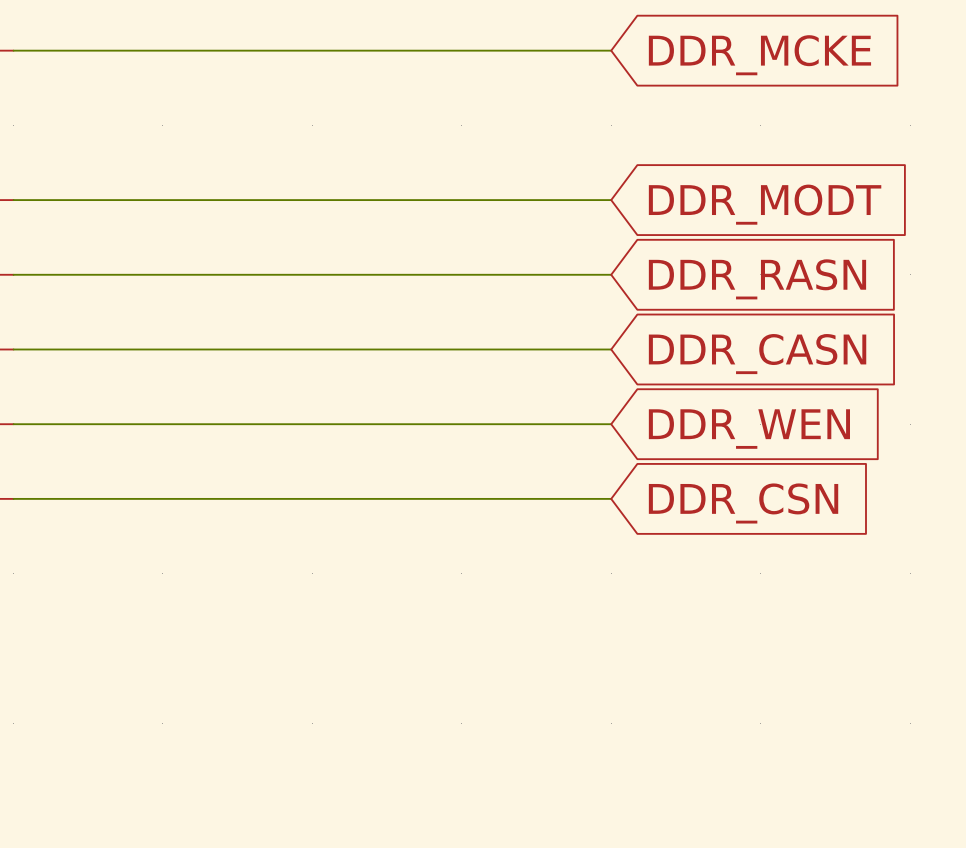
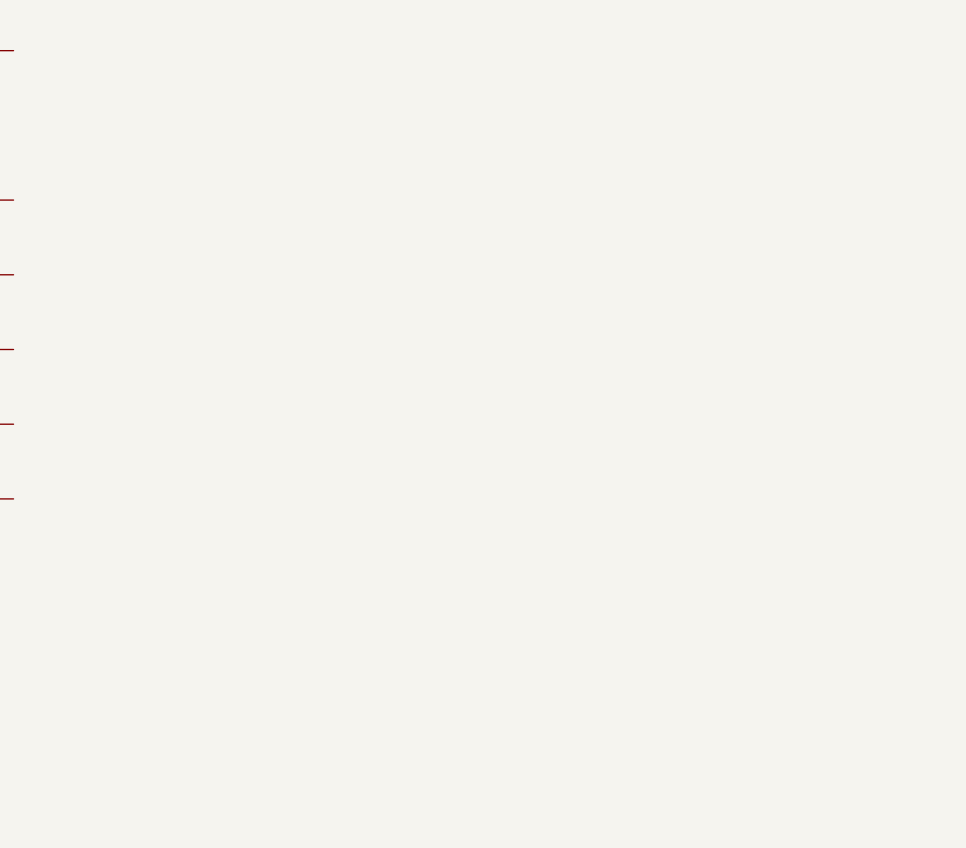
wire: (13, 50) (611, 50) -> none
global label: DDR_MCKE (759, 55) -> none
wire: (13, 200) (611, 200) -> none
global label: DDR_MODT (765, 204) -> none
wire: (13, 274) (611, 274) -> none
global label: DDR_RASN (757, 279) -> none
wire: (13, 349) (611, 349) -> none
global label: DDR_CASN (757, 354) -> none
wire: (13, 424) (611, 424) -> none
global label: DDR_WEN (749, 429) -> none
wire: (13, 498) (611, 498) -> none
global label: DDR_CSN (743, 503) -> none

